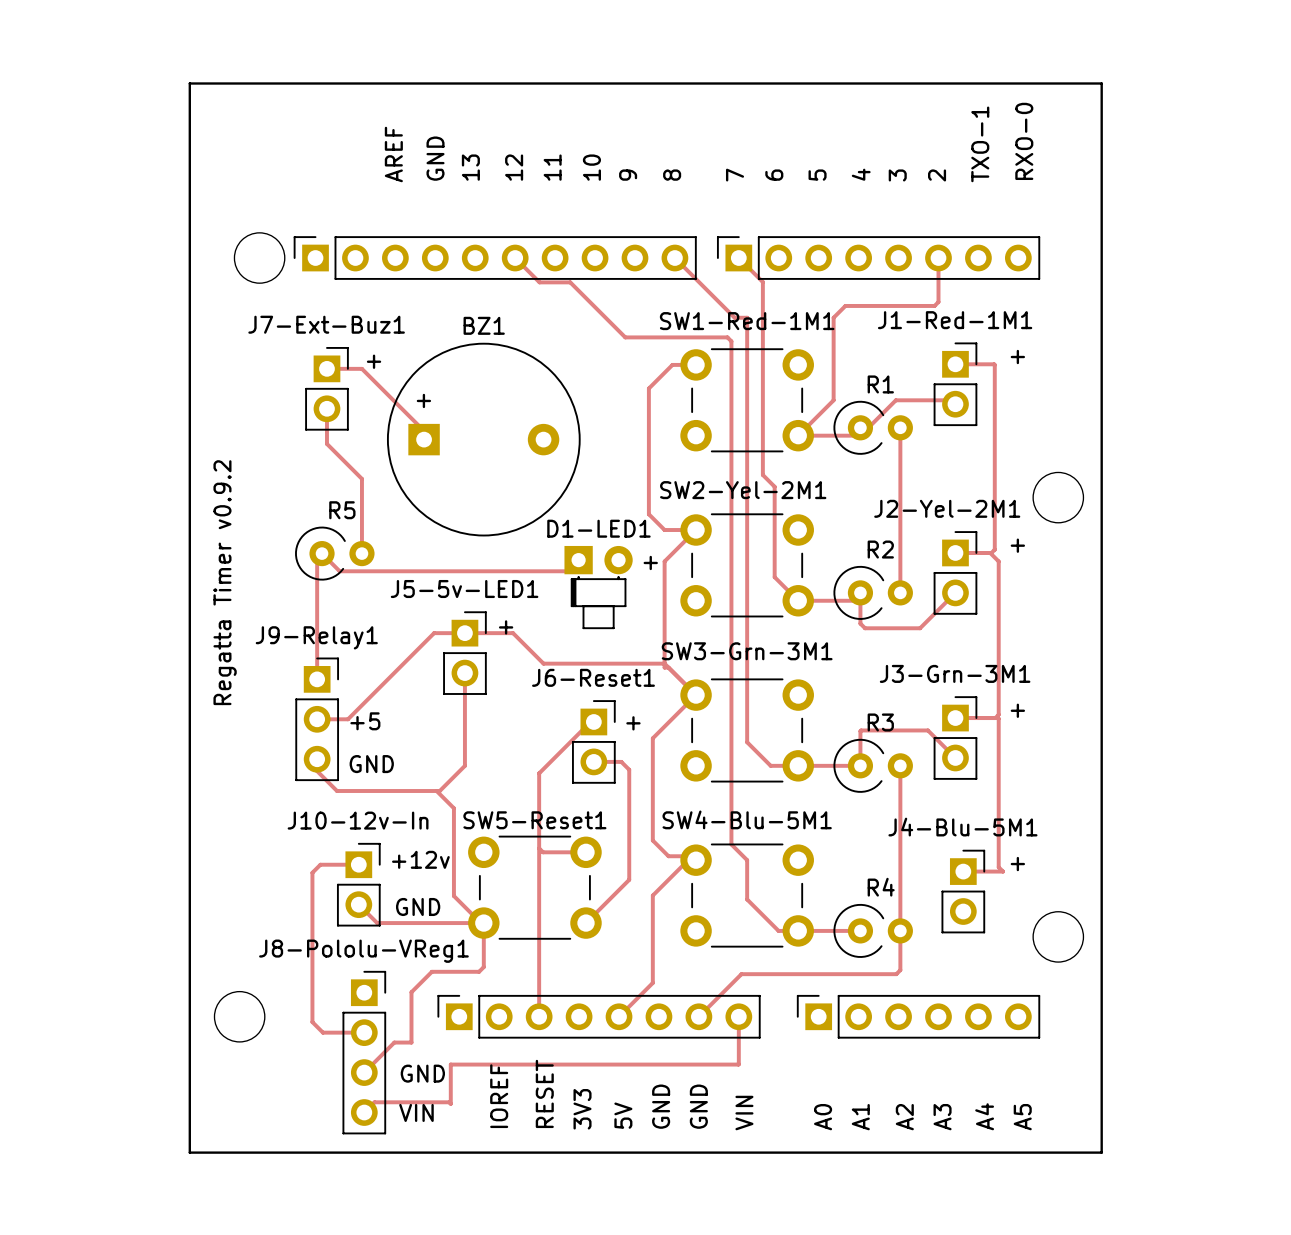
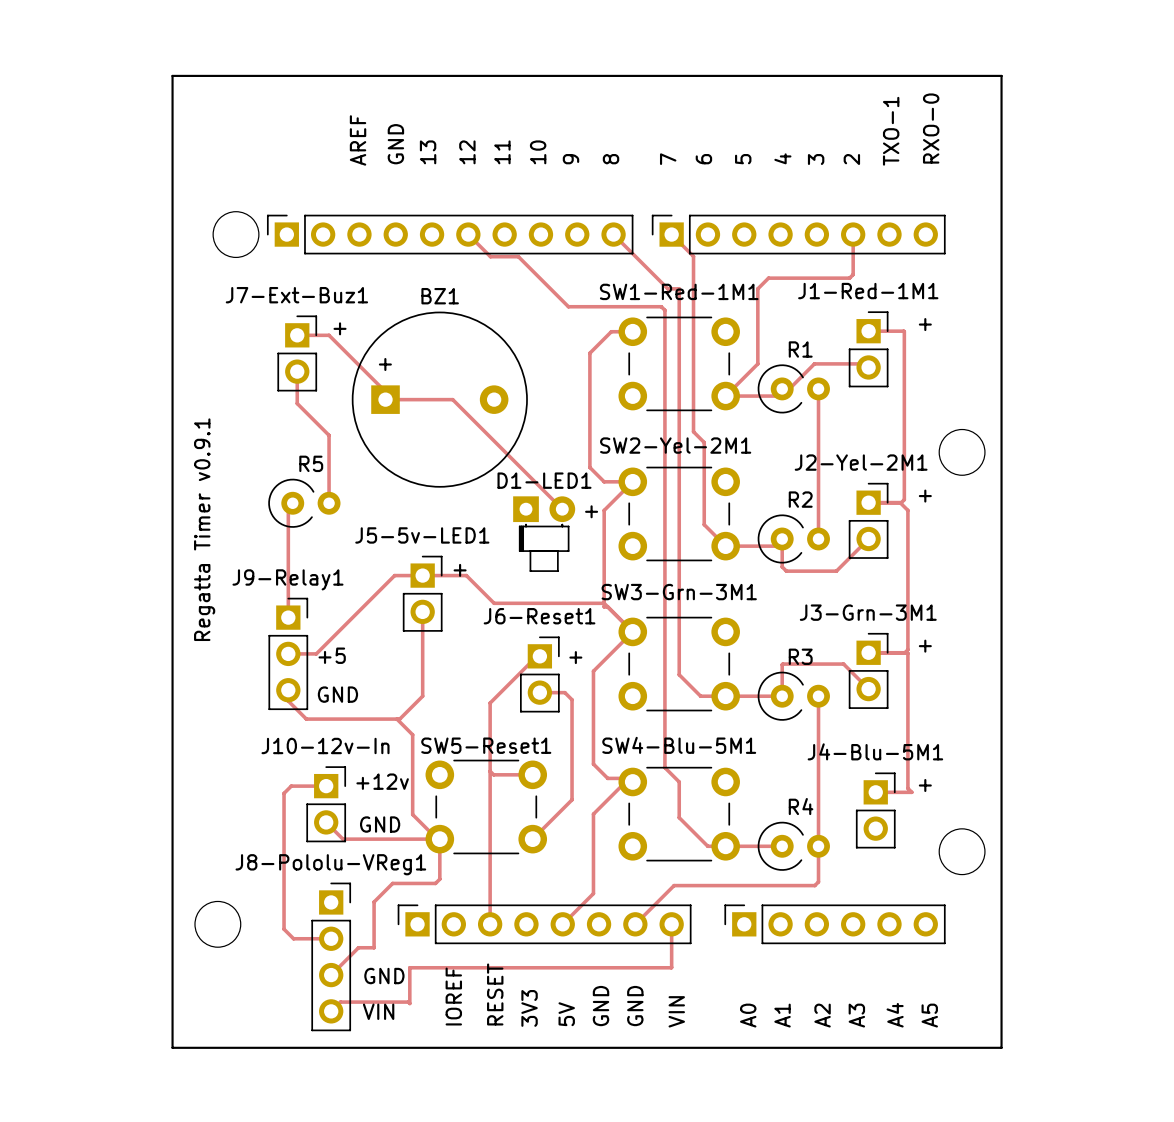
track: none -> (385, 399) (452, 399) (562, 509)
track: (322, 553) (339, 571) (567, 571) (578, 560) -> none
text: Regatta Timer v0.9.2 (225, 582) -> Regatta Timer v0.9.1 (204, 529)

